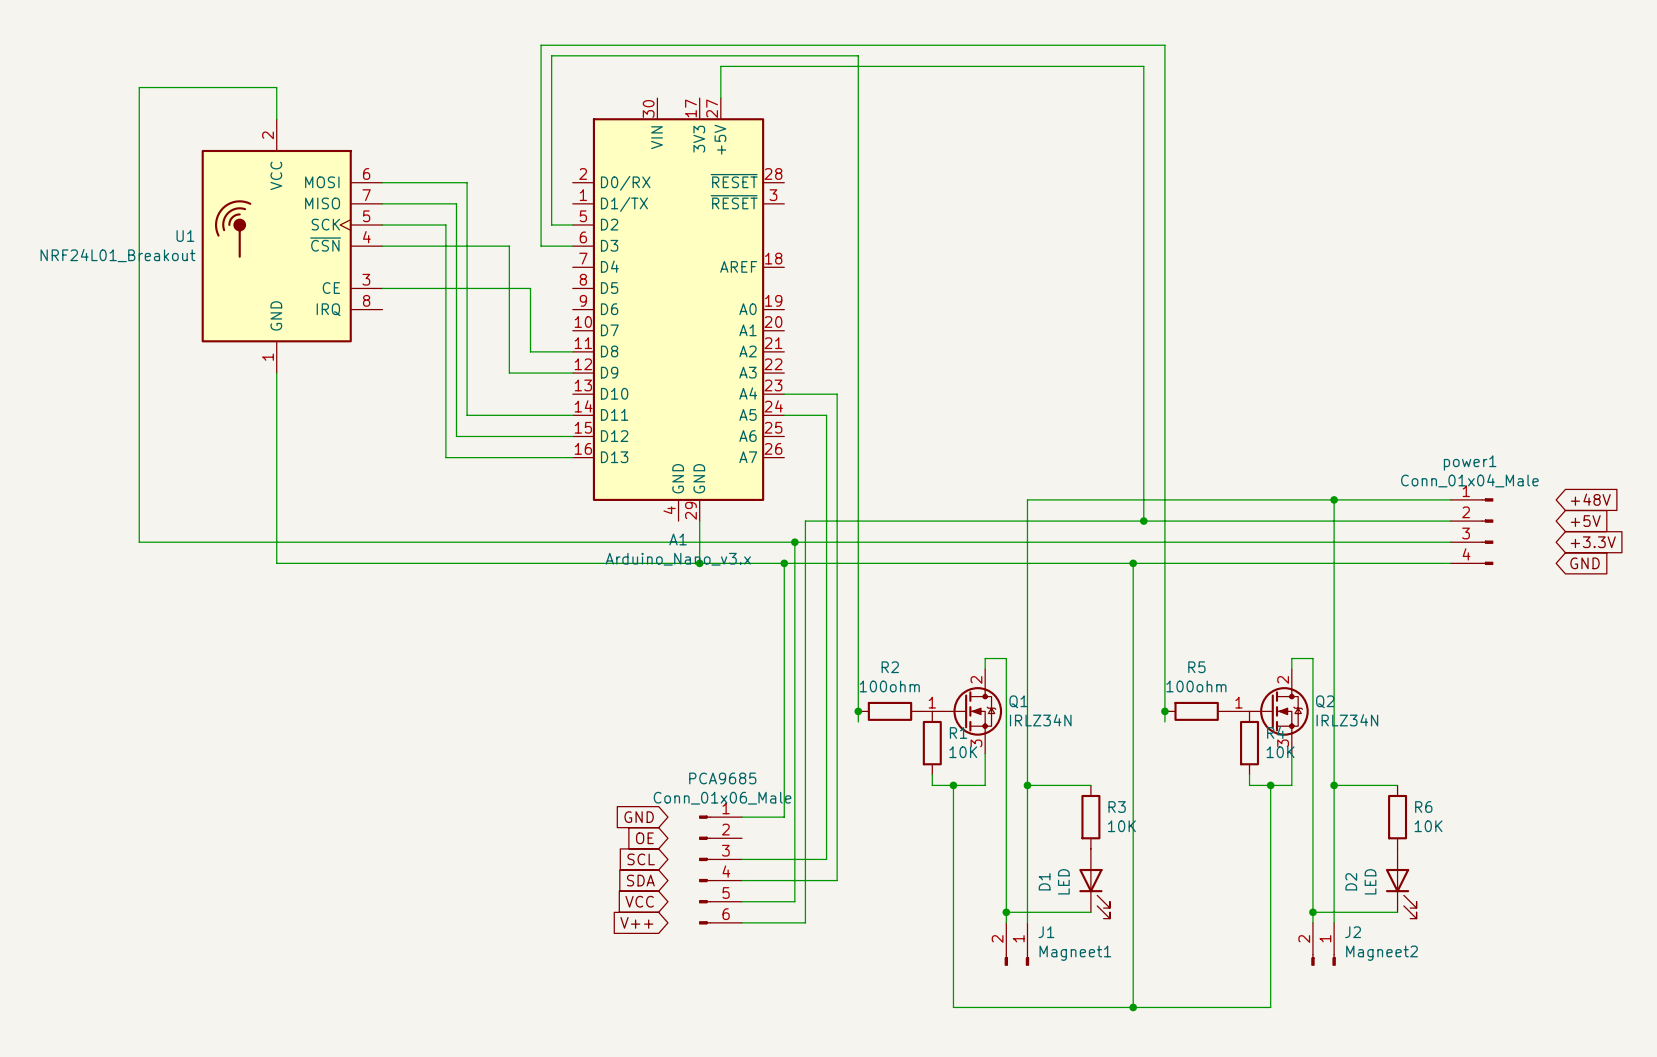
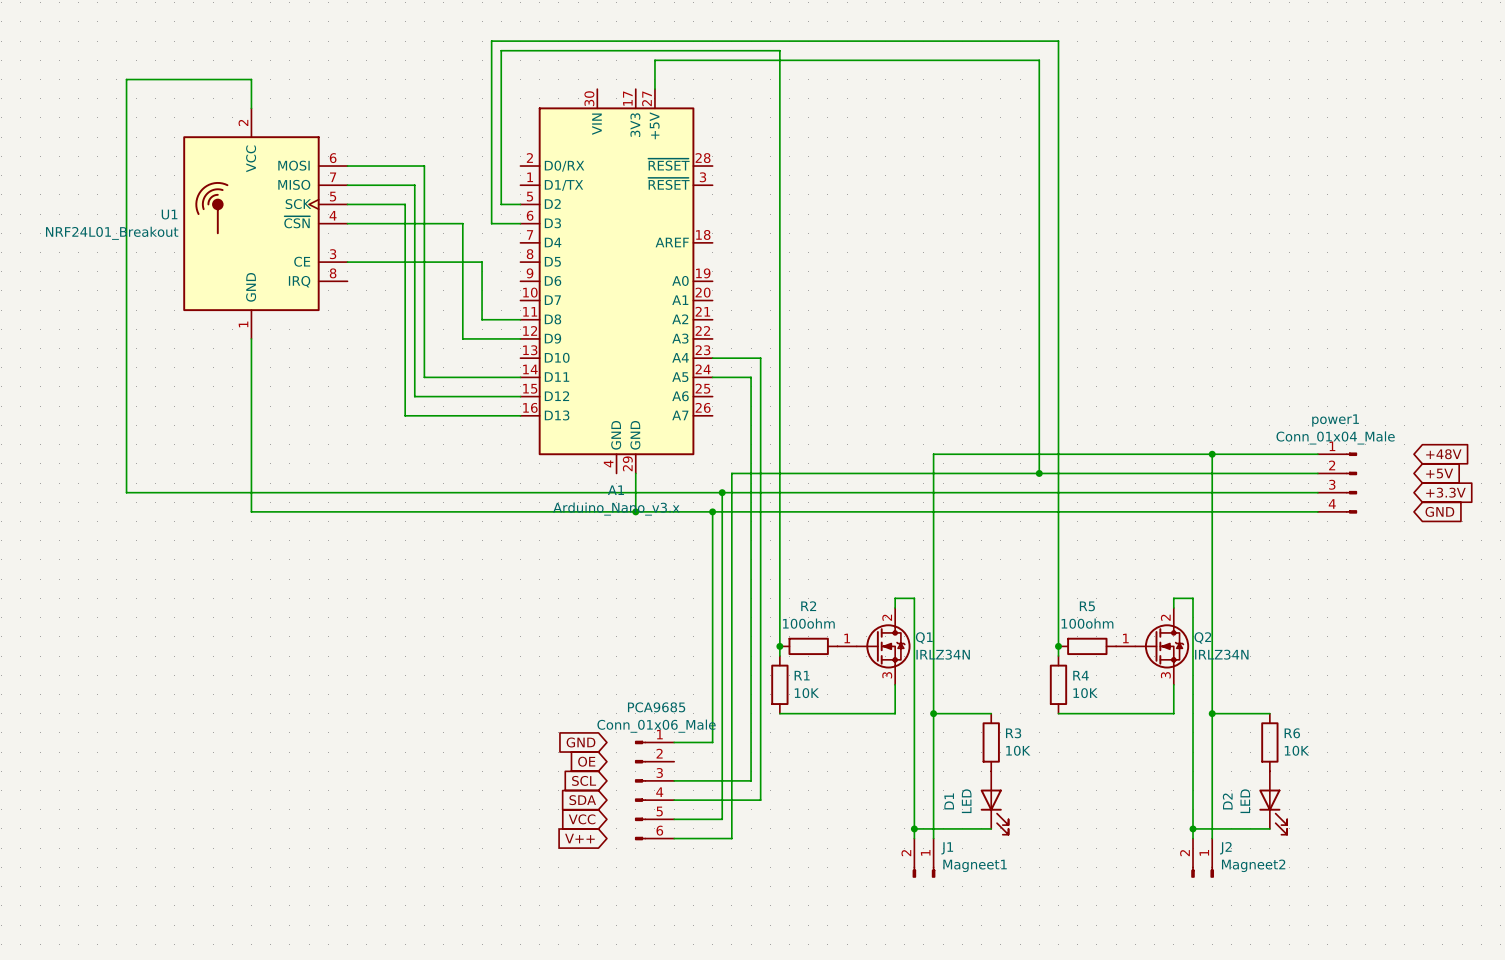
wire: (1133, 563) (1133, 1007) -> none
junction: (1133, 563) -> none
R1 position: (932, 743) -> (779, 684)
R4 position: (1249, 743) -> (1058, 684)
wire: (932, 774) (932, 785) -> (779, 713) (847, 713)
wire: (1249, 774) (1249, 785) -> (1058, 713) (1135, 713)
wire: (953, 785) (953, 1007) (1270, 1007) (1270, 785) -> none
junction: (953, 785) -> none
junction: (1270, 785) -> none
junction: (1133, 1007) -> none

